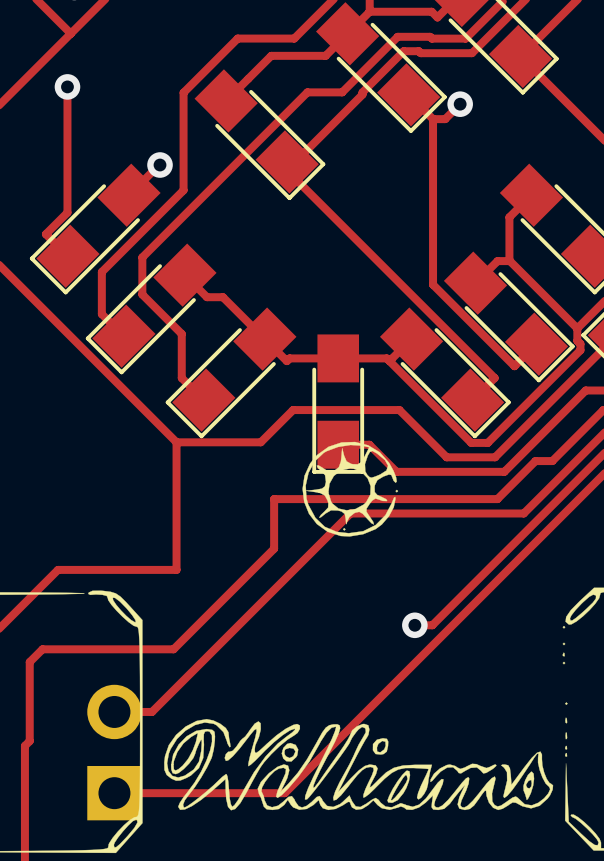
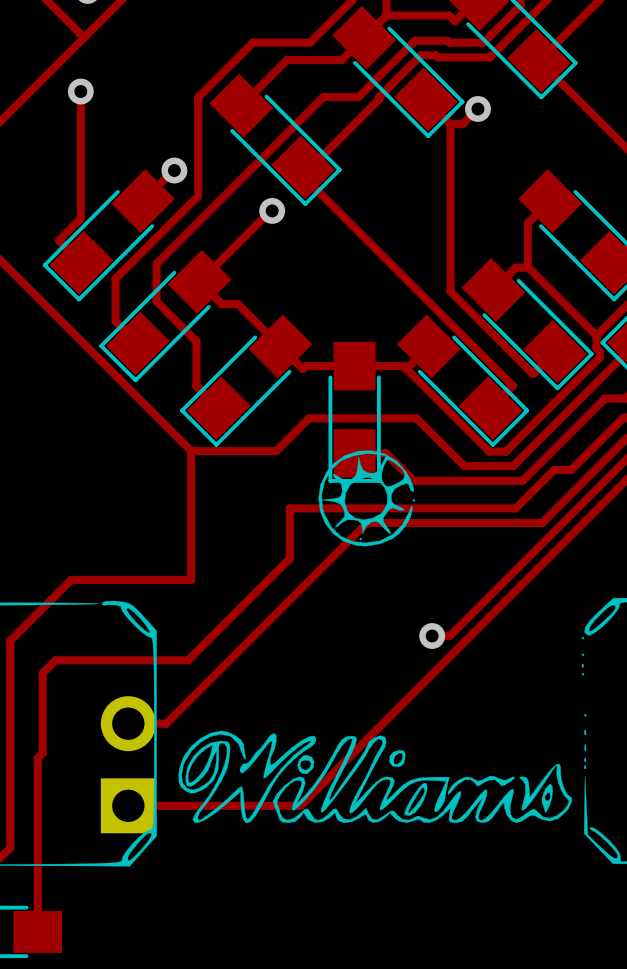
track: none -> (272, 210) (199, 281)
via: none -> (272, 210)

